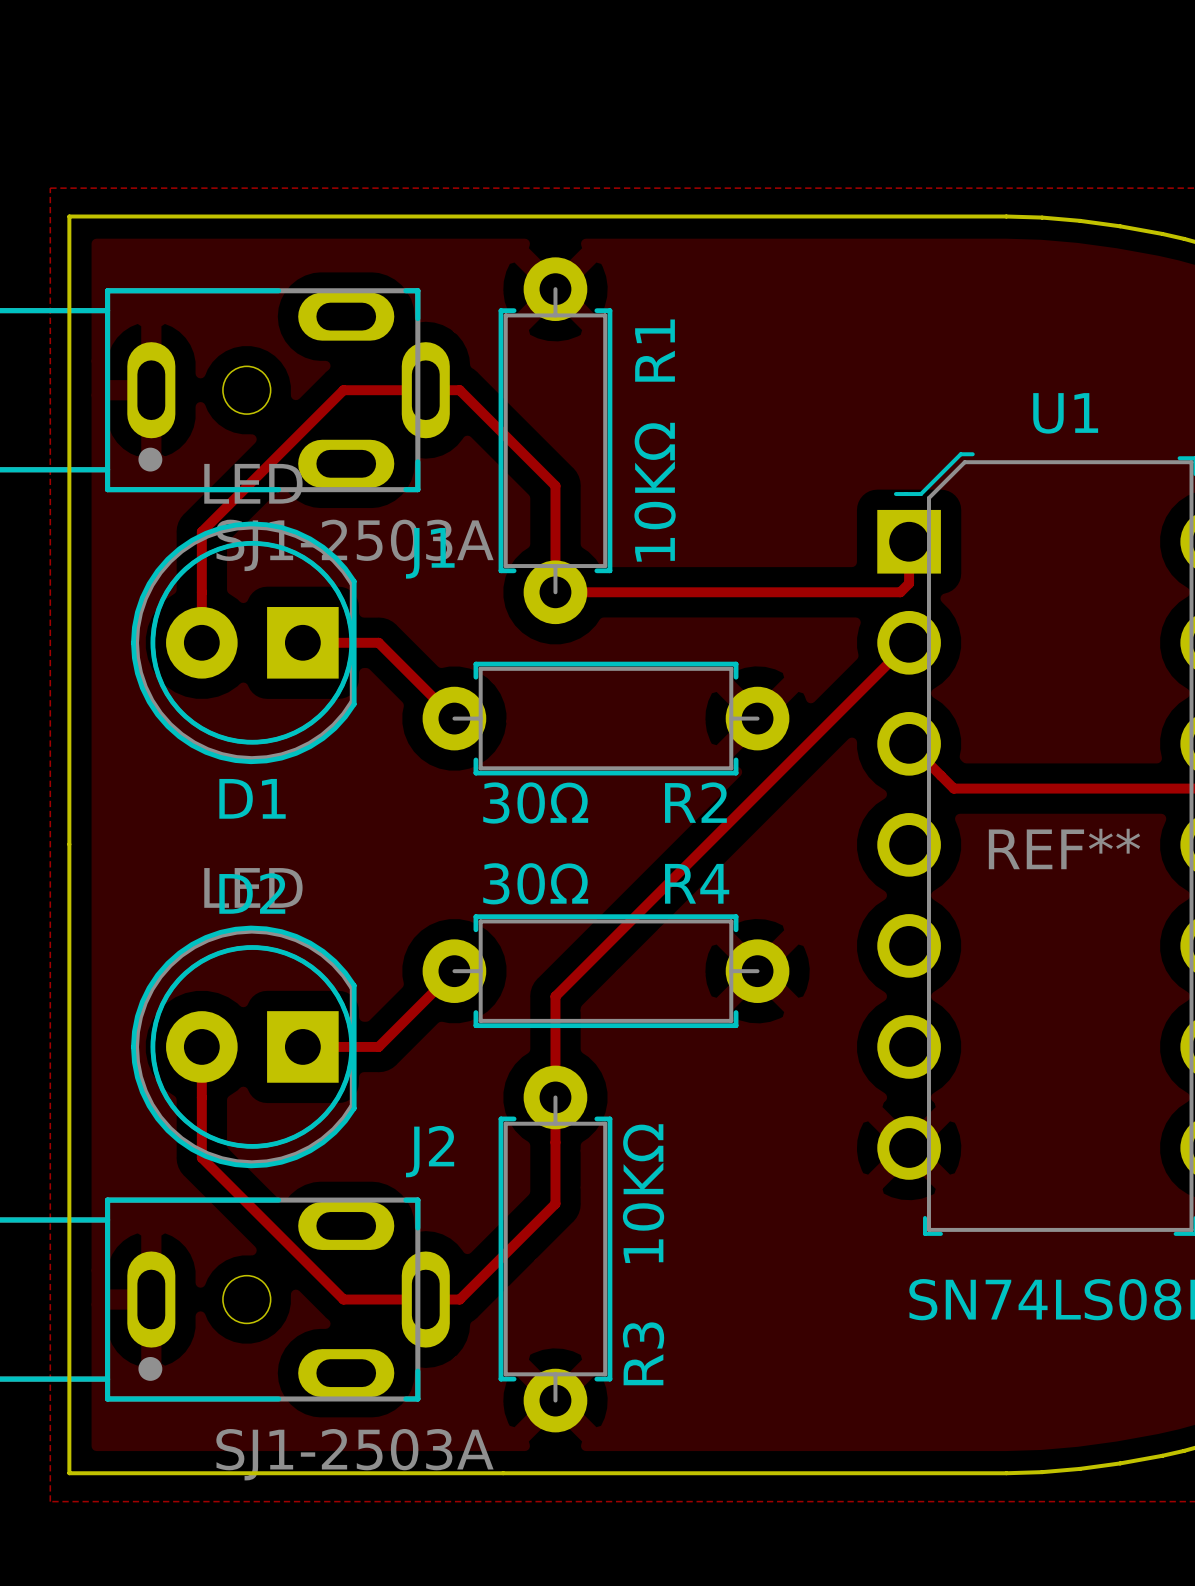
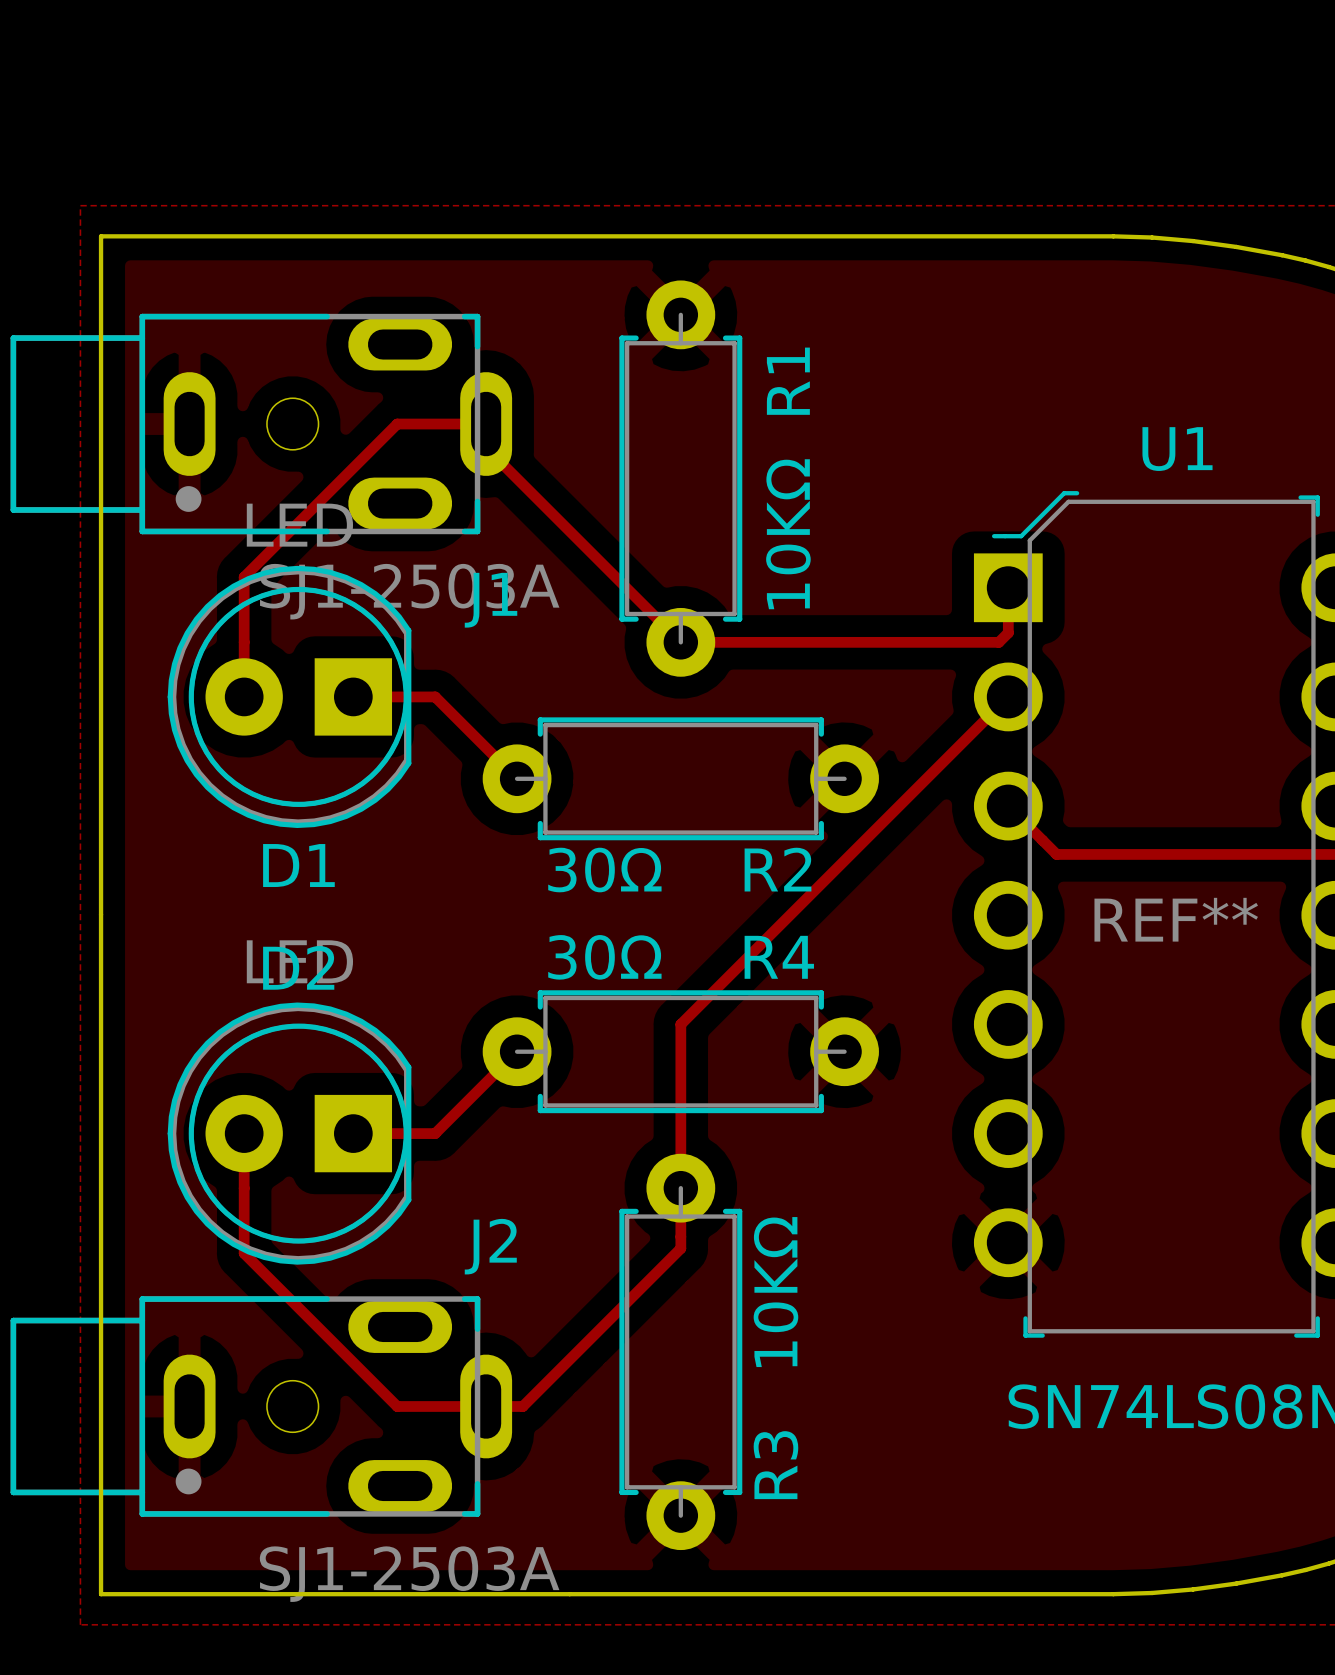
track: (425, 390) (459, 390) (555, 485) (555, 592) (605, 592) -> (486, 424) (486, 447) (680, 642)
R1 position: (555, 440) -> (680, 478)
track: (605, 945) (555, 996) (555, 1203) -> (680, 1024) (680, 1248) (626, 1303)
R3 position: (555, 1249) -> (680, 1351)

